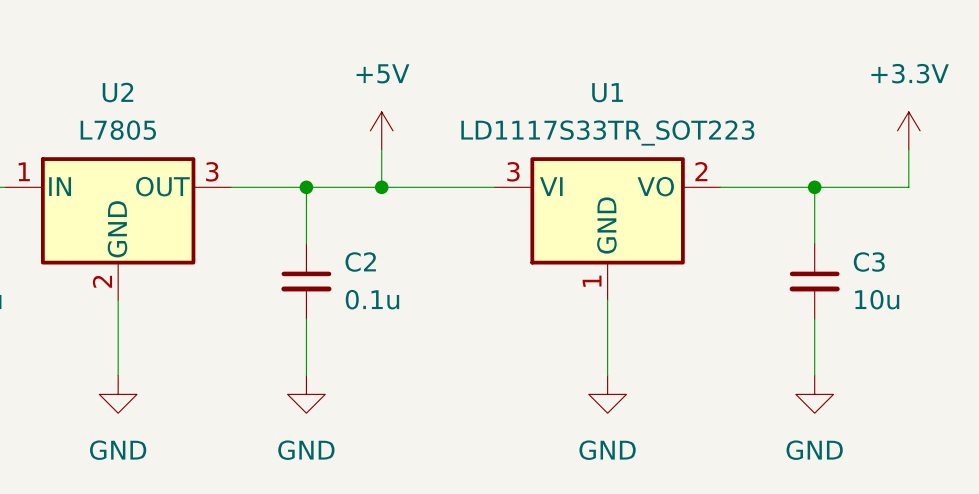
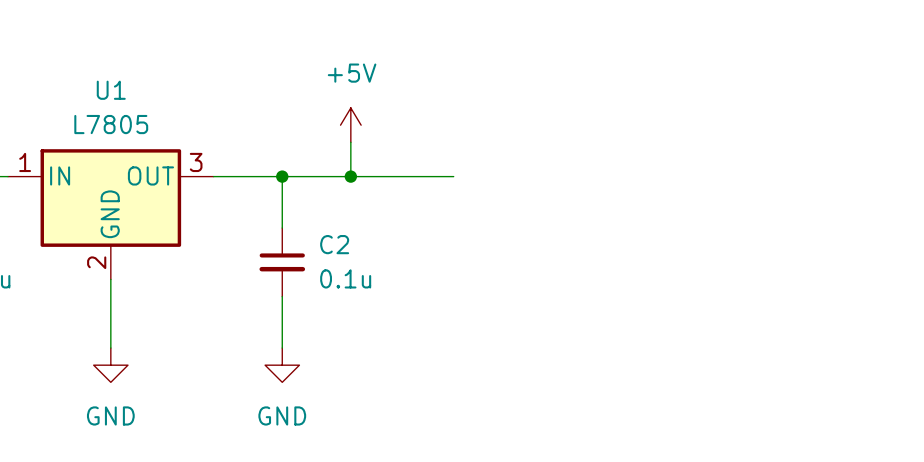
U2 name: U2 (117, 92) -> U1 (111, 90)
power symbol: +3.3V (908, 130) -> none
wire: (908, 149) (908, 187) (720, 187) -> none
wire: (814, 187) (814, 243) -> none
junction: (814, 187) -> none
U1: LD1117S33TR_SOT223 (607, 228) -> none
C3: 10u (814, 281) -> none
wire: (607, 300) (607, 375) -> none
wire: (814, 319) (814, 375) -> none
power symbol: GND (607, 394) -> none
power symbol: GND (814, 394) -> none

